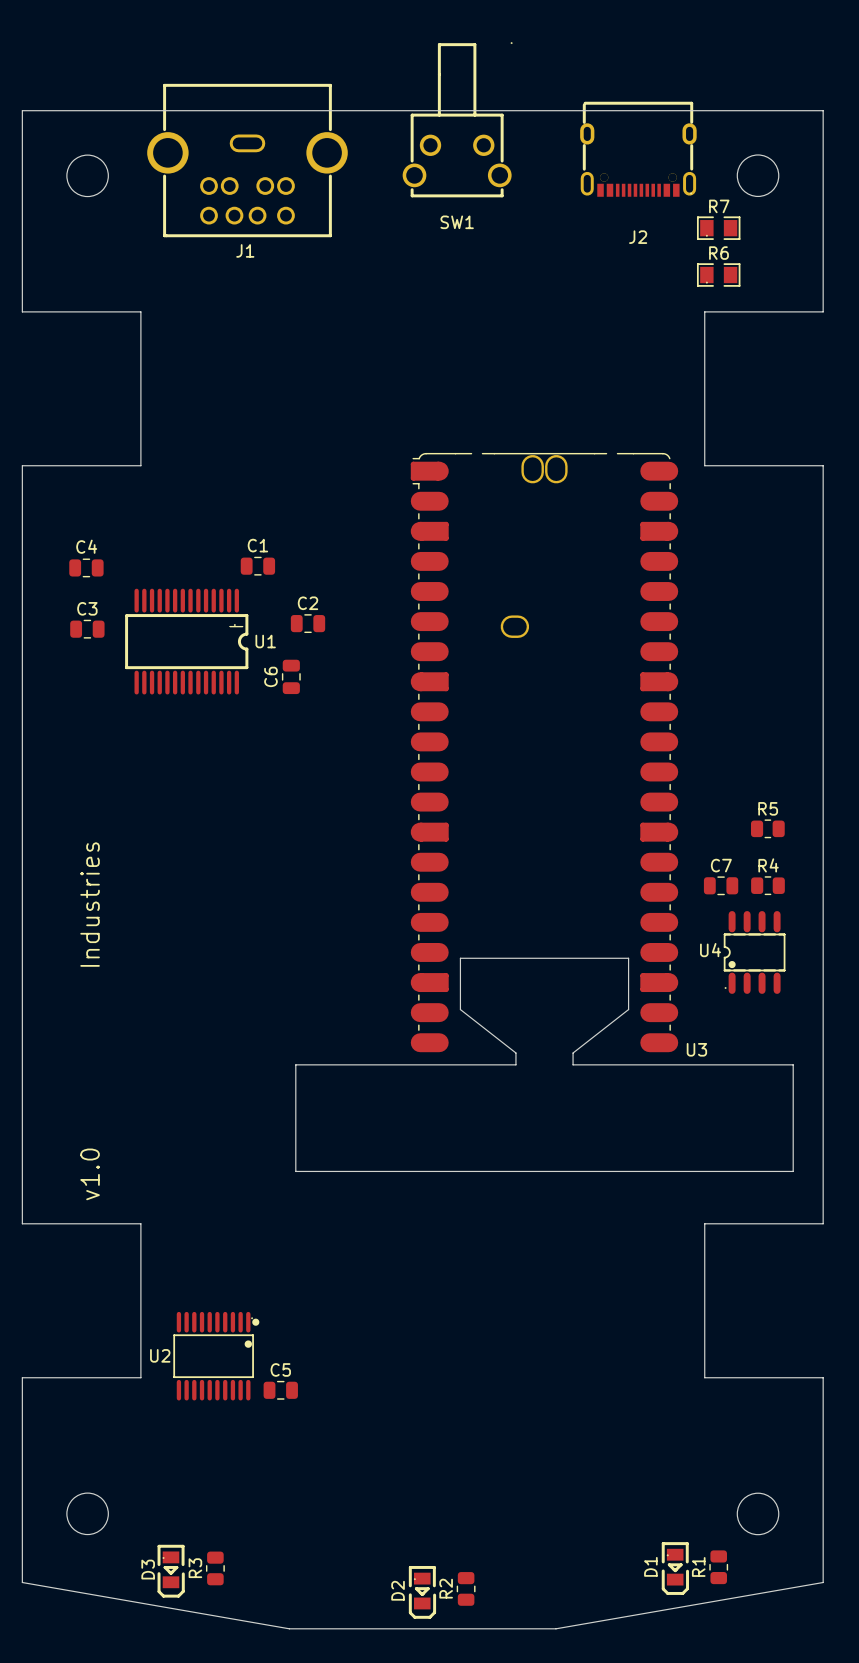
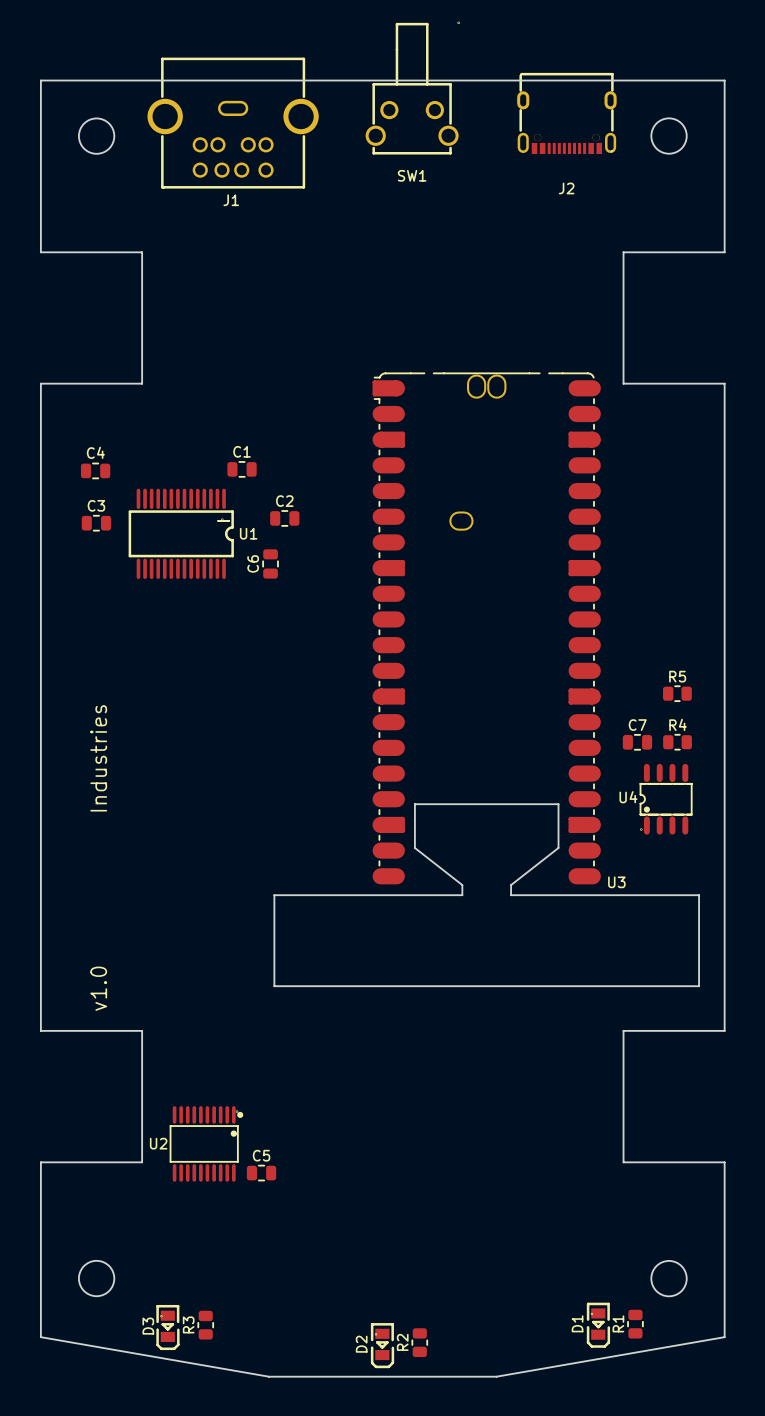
R7: (718, 228) -> none
R6: (718, 275) -> none

